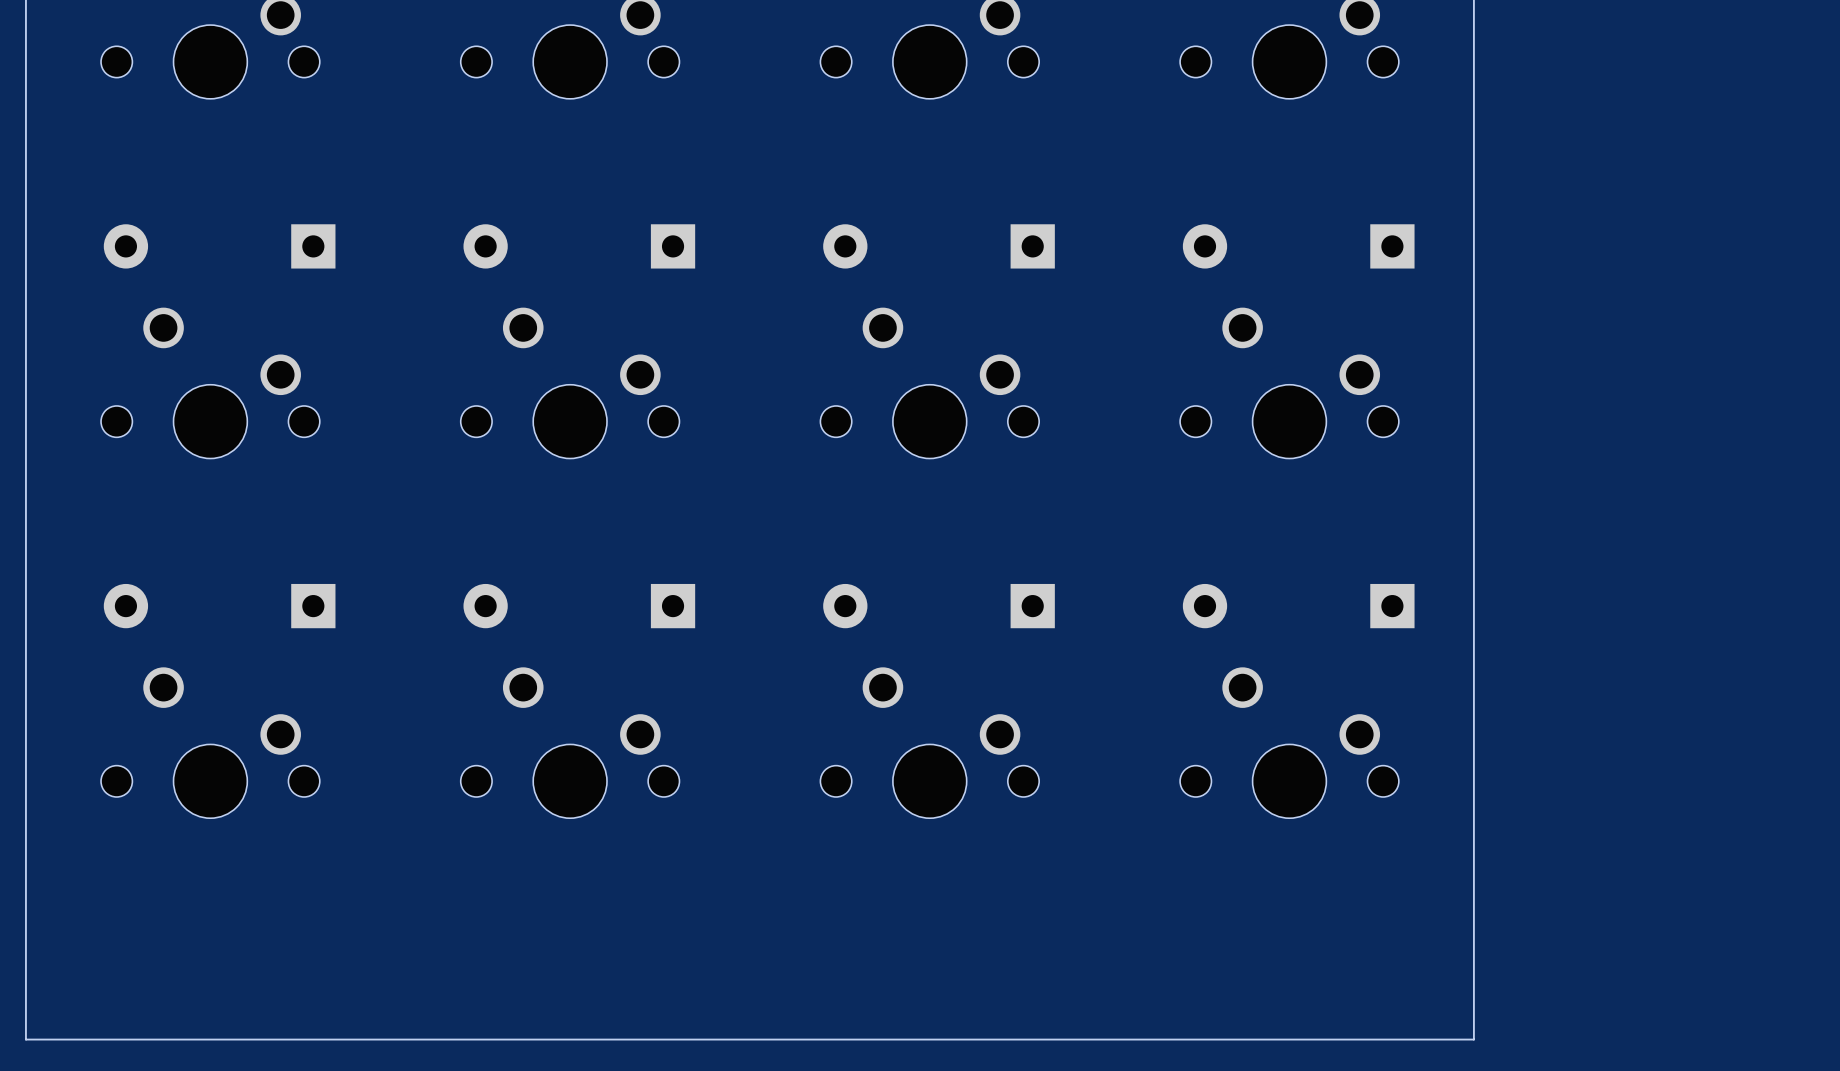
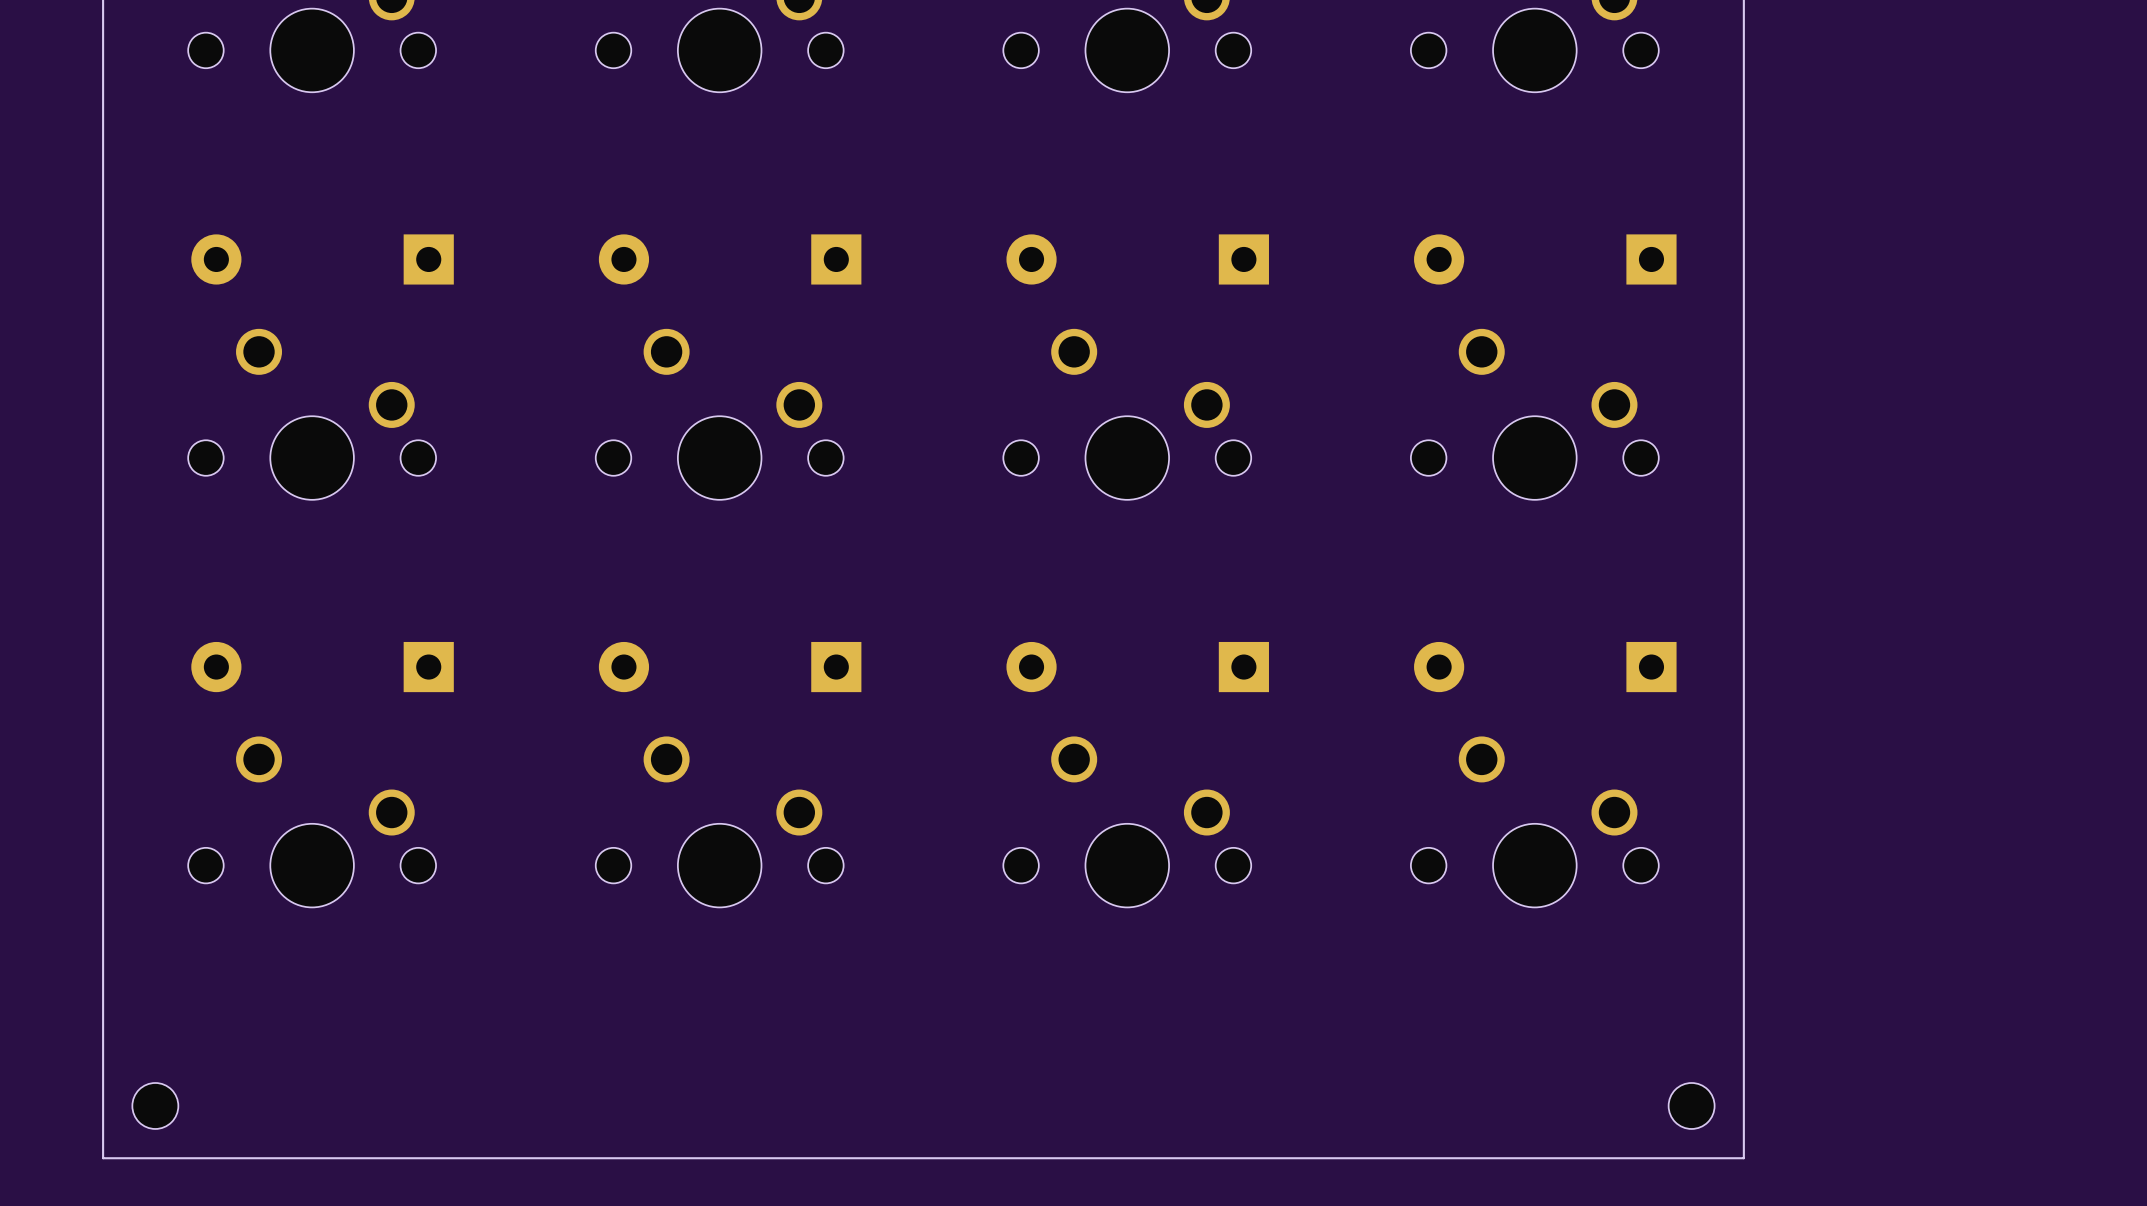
part: none -> (155, 1105)
part: none -> (1691, 1105)

